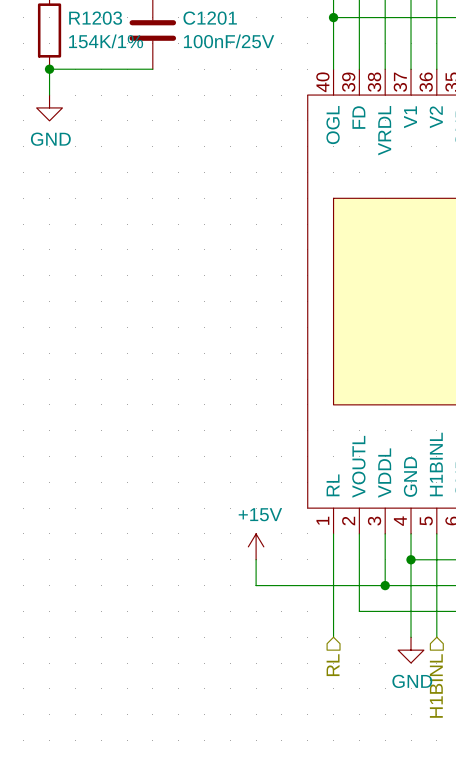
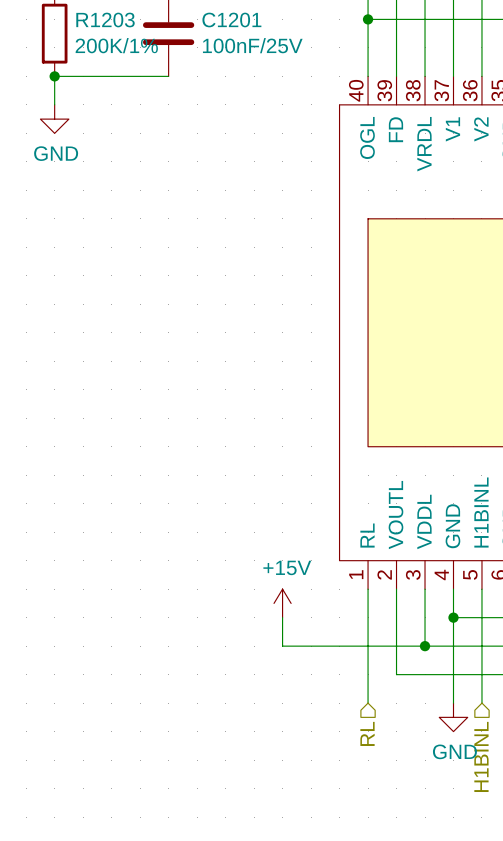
R1203 value: 154K/1% (106, 41) -> 200K/1% (116, 45)

